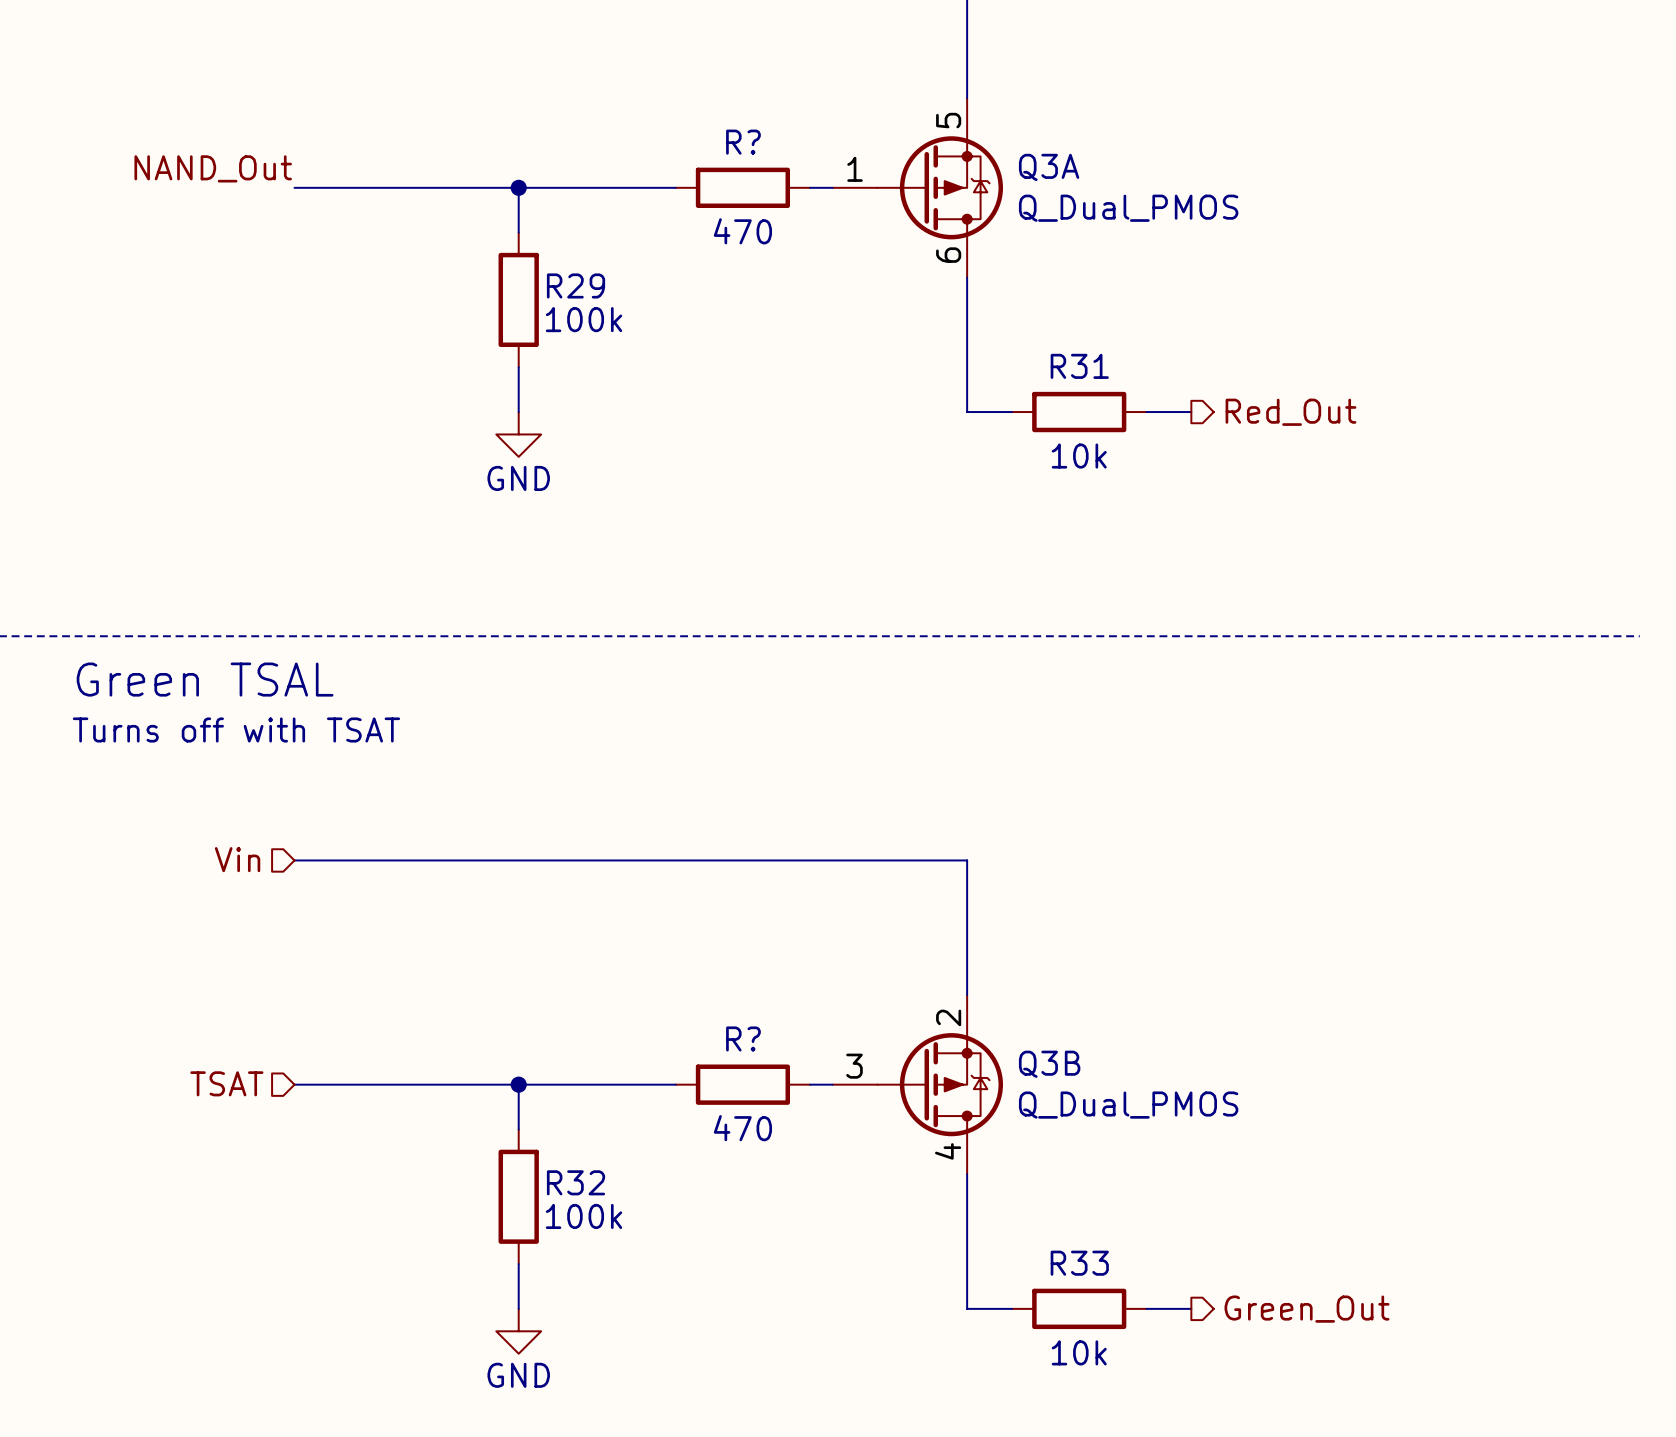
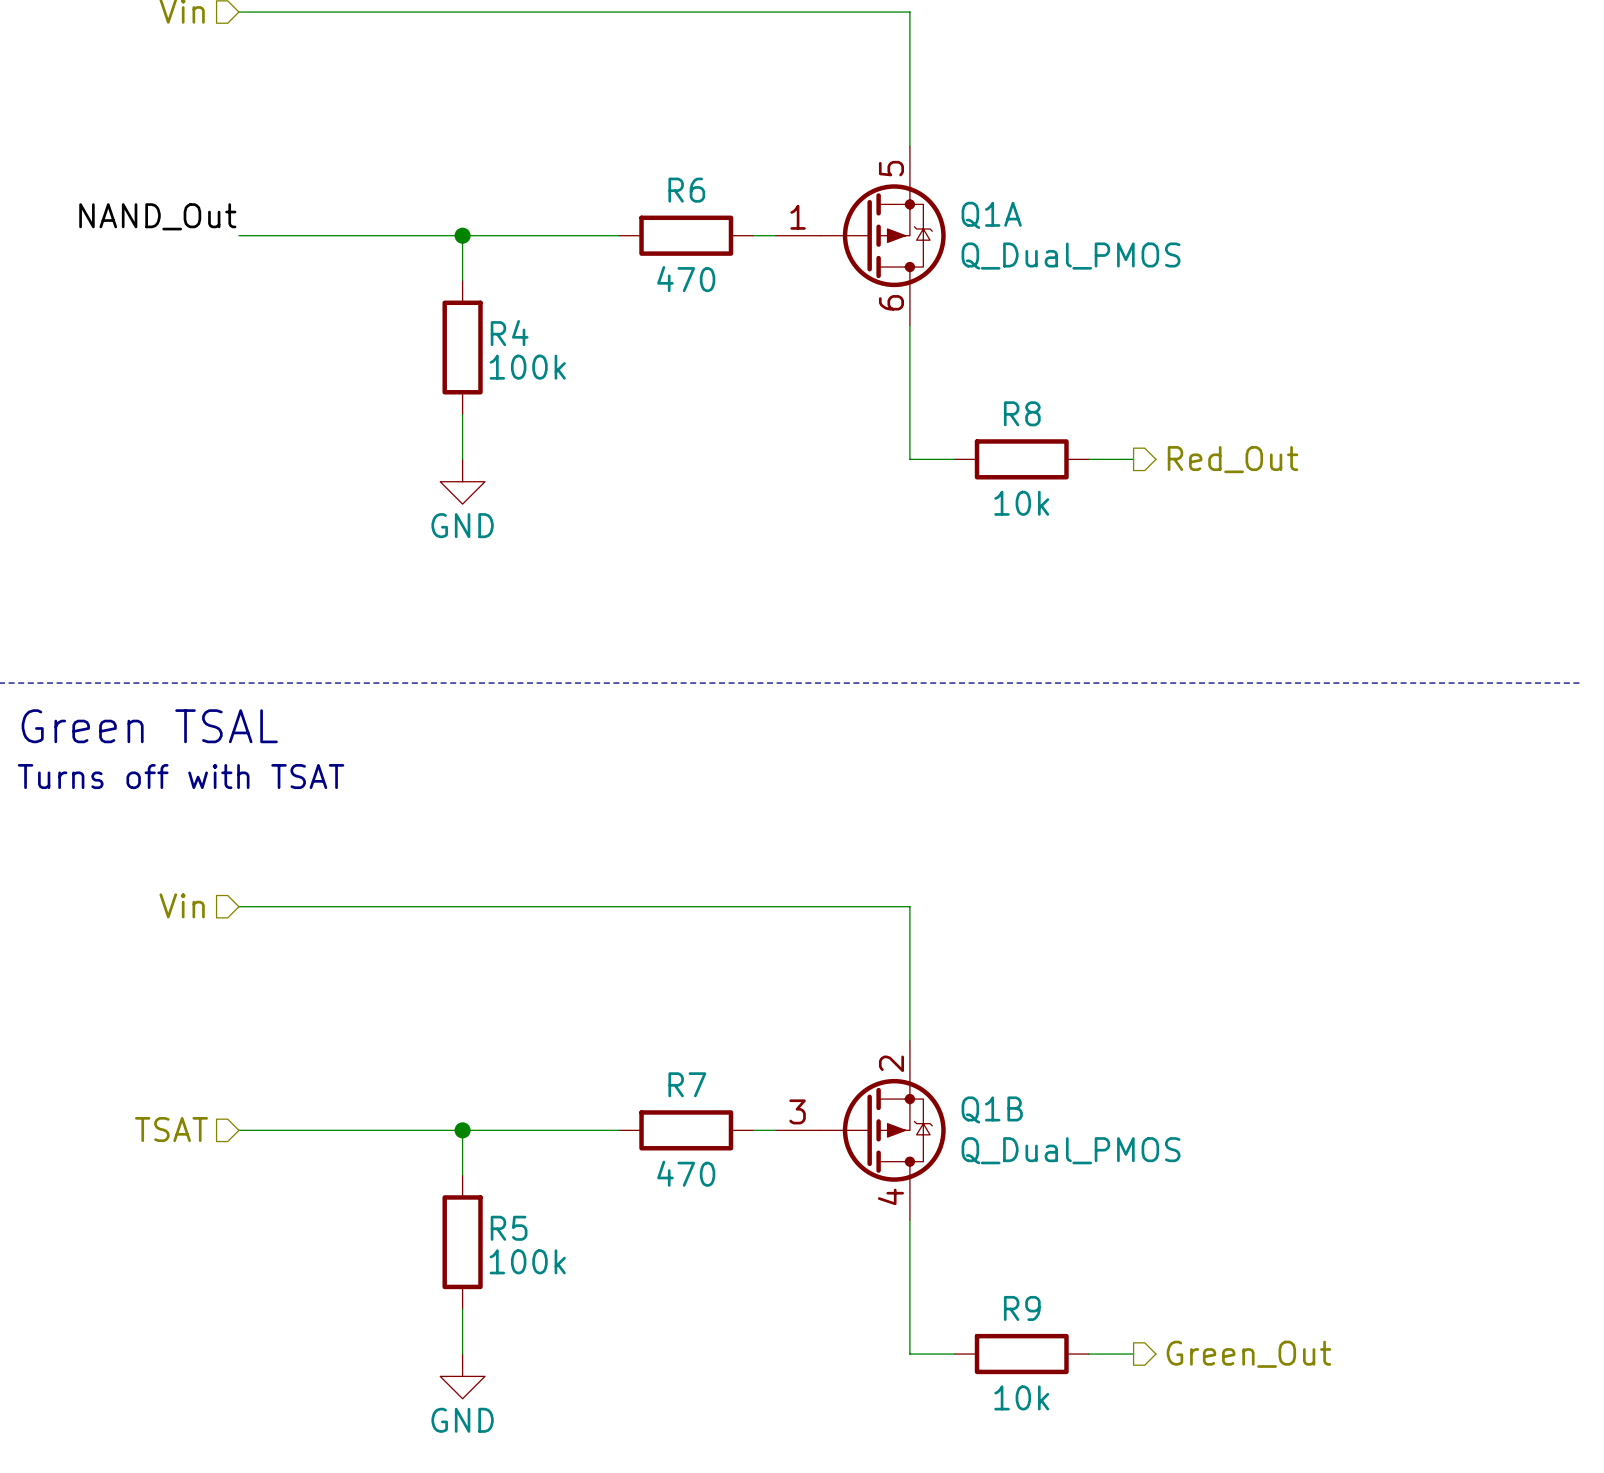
R? name: R? (743, 142) -> R6 (686, 190)
Q3A name: Q3A (1049, 167) -> Q1A (991, 215)
R29 name: R29 (576, 285) -> R4 (509, 333)
R31 name: R31 (1079, 366) -> R8 (1022, 413)
R? name: R? (743, 1038) -> R7 (687, 1084)
Q3B name: Q3B (1049, 1064) -> Q1B (992, 1110)
R32 name: R32 (576, 1182) -> R5 (509, 1228)
R33 name: R33 (1079, 1263) -> R9 (1022, 1308)

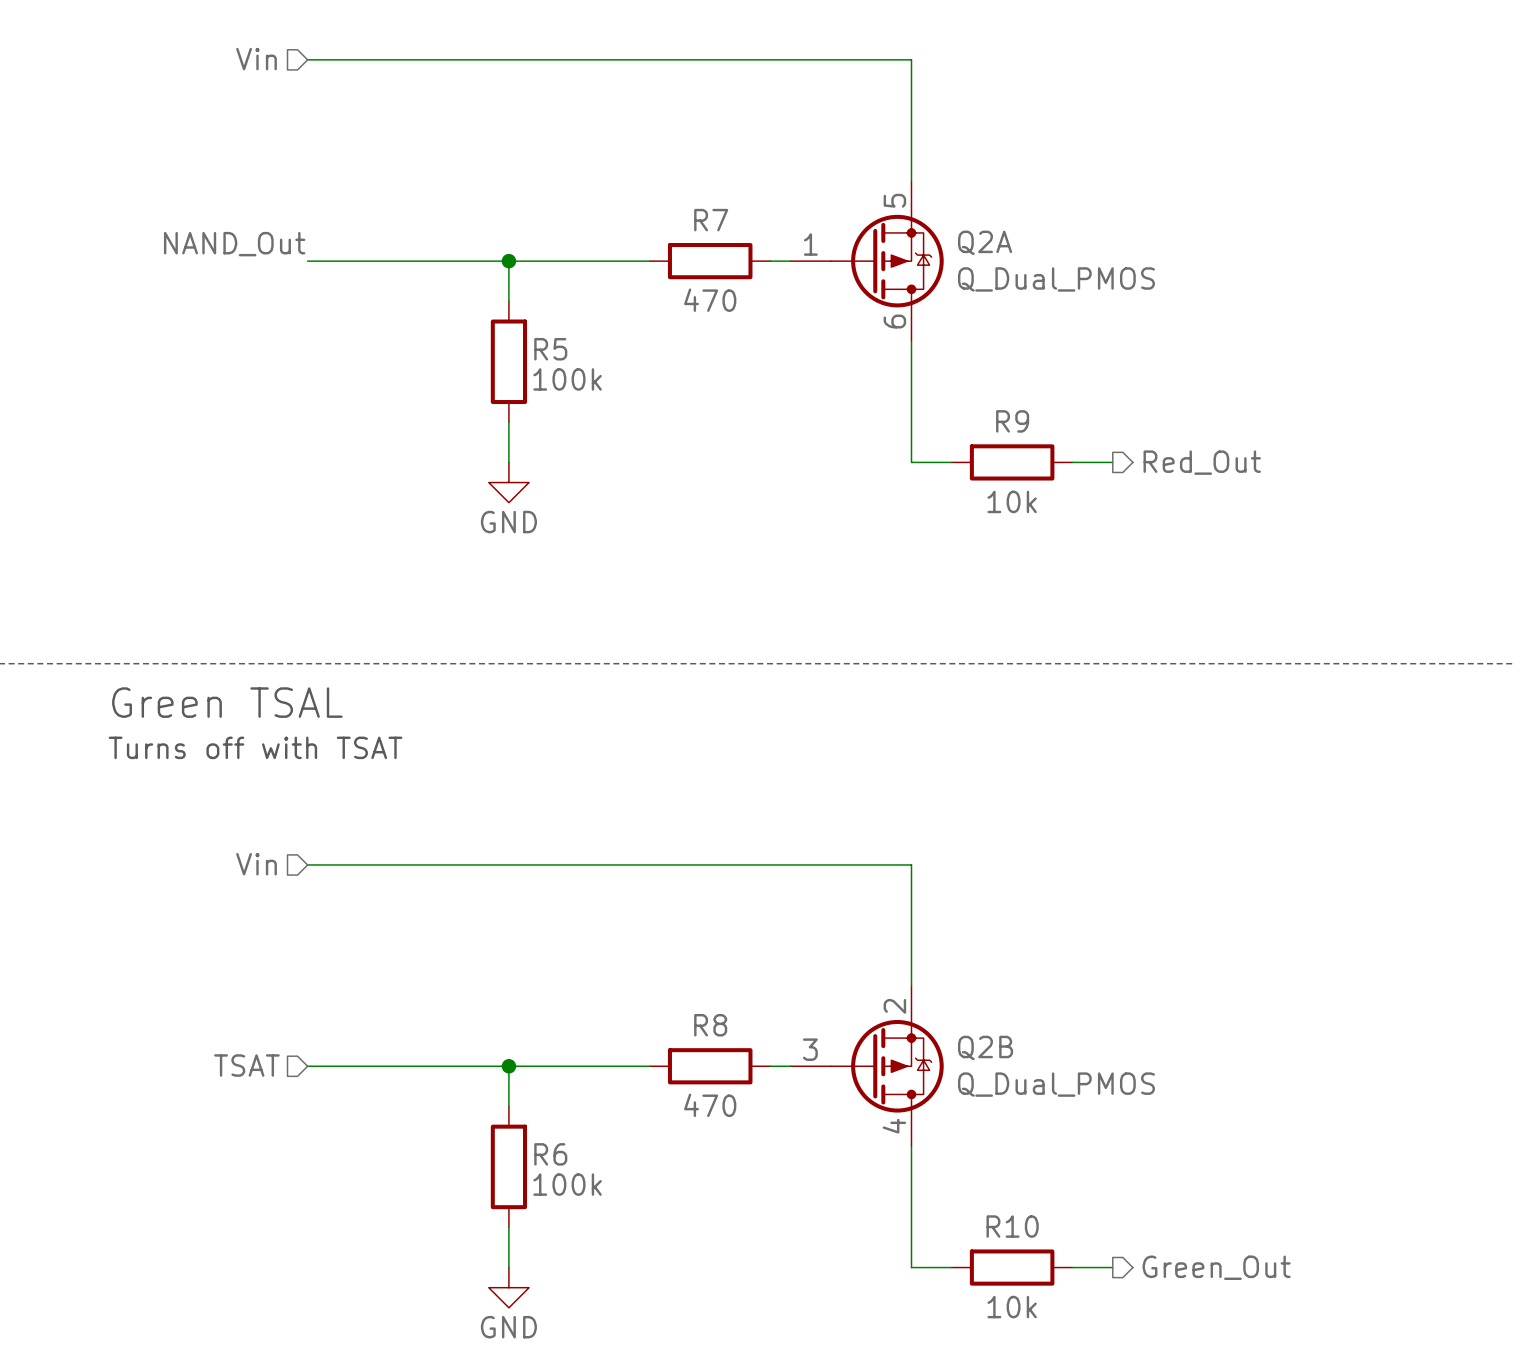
R6 name: R6 (686, 190) -> R7 (711, 220)
Q1A name: Q1A (991, 215) -> Q2A (985, 242)
R4 name: R4 (509, 333) -> R5 (550, 349)
R8 name: R8 (1022, 413) -> R9 (1012, 421)
R7 name: R7 (687, 1084) -> R8 (710, 1025)
Q1B name: Q1B (992, 1110) -> Q2B (985, 1047)
R5 name: R5 (509, 1228) -> R6 (550, 1154)
R9 name: R9 (1022, 1308) -> R10 (1012, 1226)

